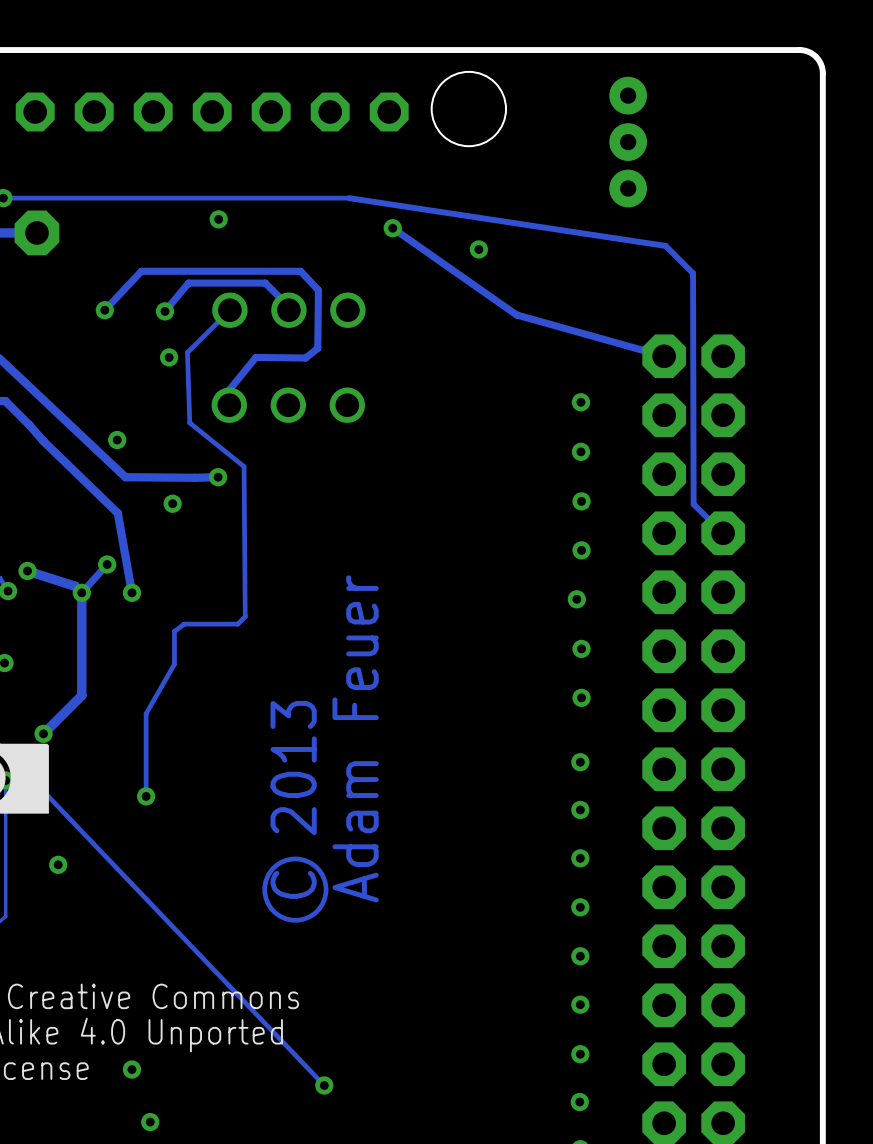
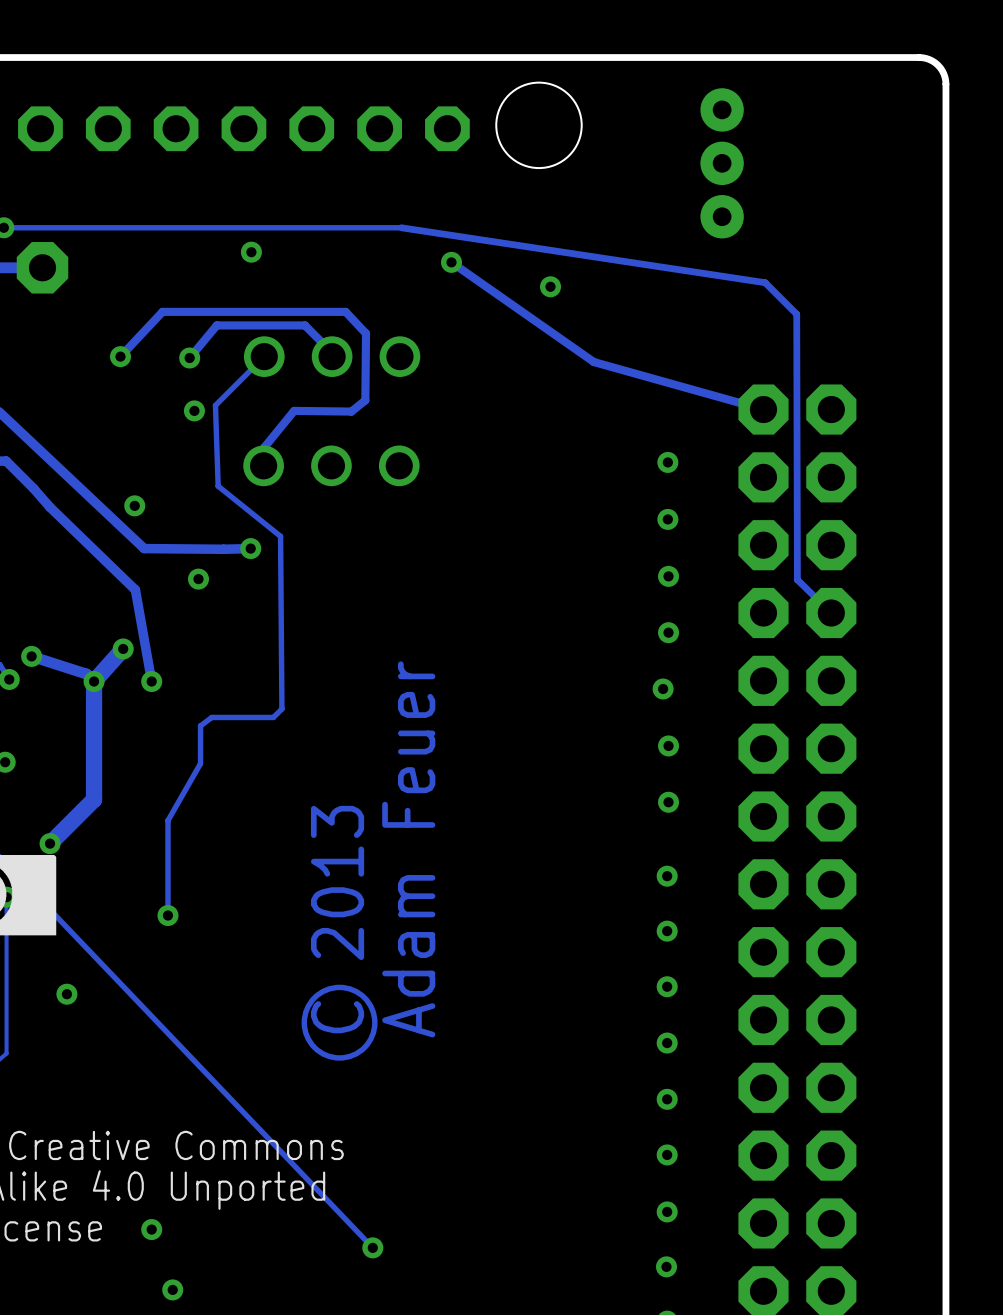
track width: thin (107, 564) (81, 592) (81, 695) (43, 733) -> thick (123, 648) (94, 681) (94, 799) (50, 843)

